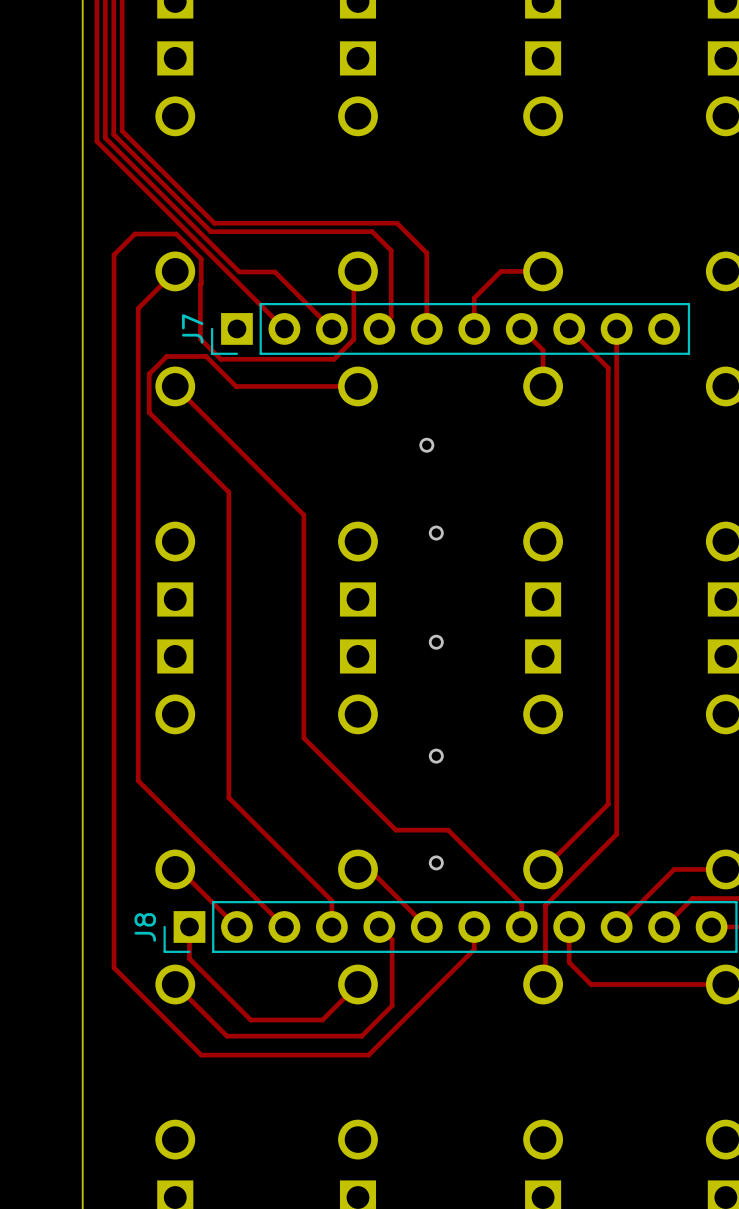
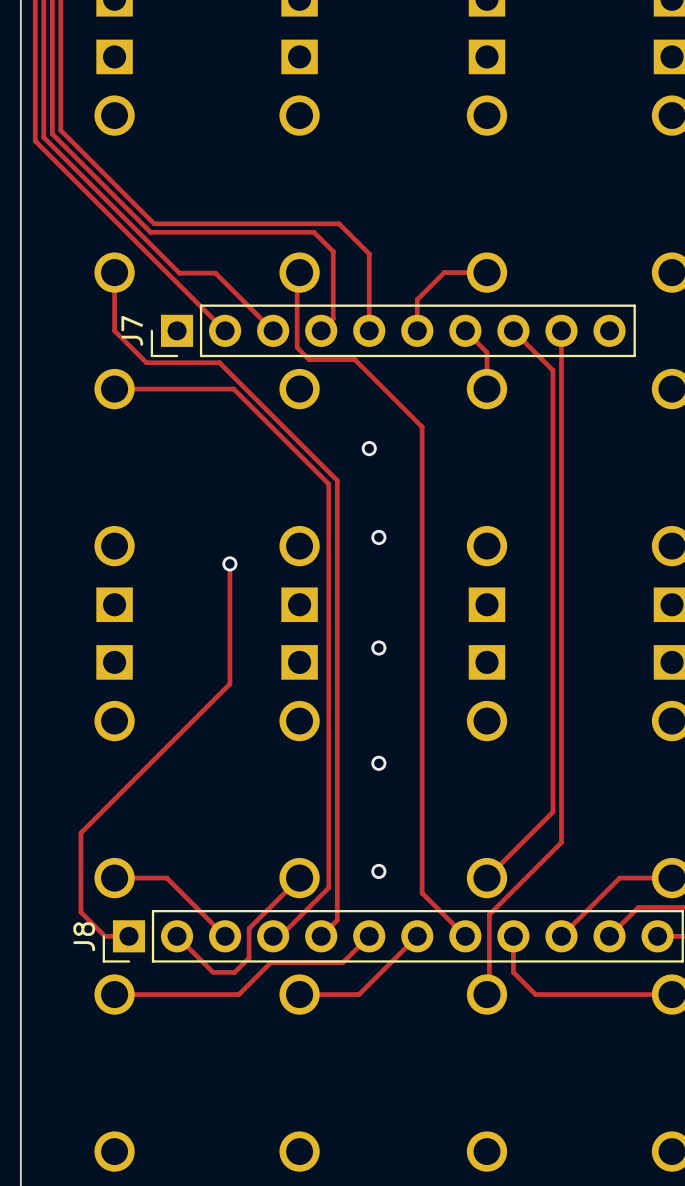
track: (175, 271) (138, 308) (138, 780) (226, 869) -> (114, 272) (114, 330) (146, 362) (219, 362) (337, 480) (337, 920) (321, 936)
track: (355, 273) (353, 275) (353, 339) (334, 359) (220, 359) (200, 338) (201, 258) (176, 234) (134, 234) (114, 254) (114, 967) (201, 1055) (368, 1055) (474, 949) (474, 926) -> (297, 275) (297, 347) (309, 359) (354, 359) (422, 426) (422, 893) (465, 936)
track: (175, 386) (303, 515) (303, 738) (395, 830) (448, 830) (521, 903) (521, 926) -> (114, 389) (176, 389)
track: (236, 386) (206, 356) (166, 356) (149, 373) (149, 412) (228, 492) (228, 797) (331, 900) (331, 926) -> (233, 389) (328, 484) (328, 887) (280, 936) (273, 936)
track: (292, 386) (357, 386) -> none
track: none -> (229, 563) (229, 684) (80, 833) (80, 912) (104, 936) (128, 936)
via: none -> (229, 563)
track: (179, 869) (236, 926) -> (118, 878) (166, 878)
track: (357, 869) (369, 869) (426, 926) -> (299, 878) (249, 928) (249, 957) (234, 972) (213, 972) (177, 936)
track: (189, 926) (189, 958) (250, 1020) (322, 1020) (357, 984) -> (417, 936) (359, 994) (299, 994)
track: (379, 926) (392, 939) (392, 1005) (361, 1036) (226, 1036) (175, 984) -> (369, 936) (342, 962) (270, 962) (238, 994) (114, 994)

